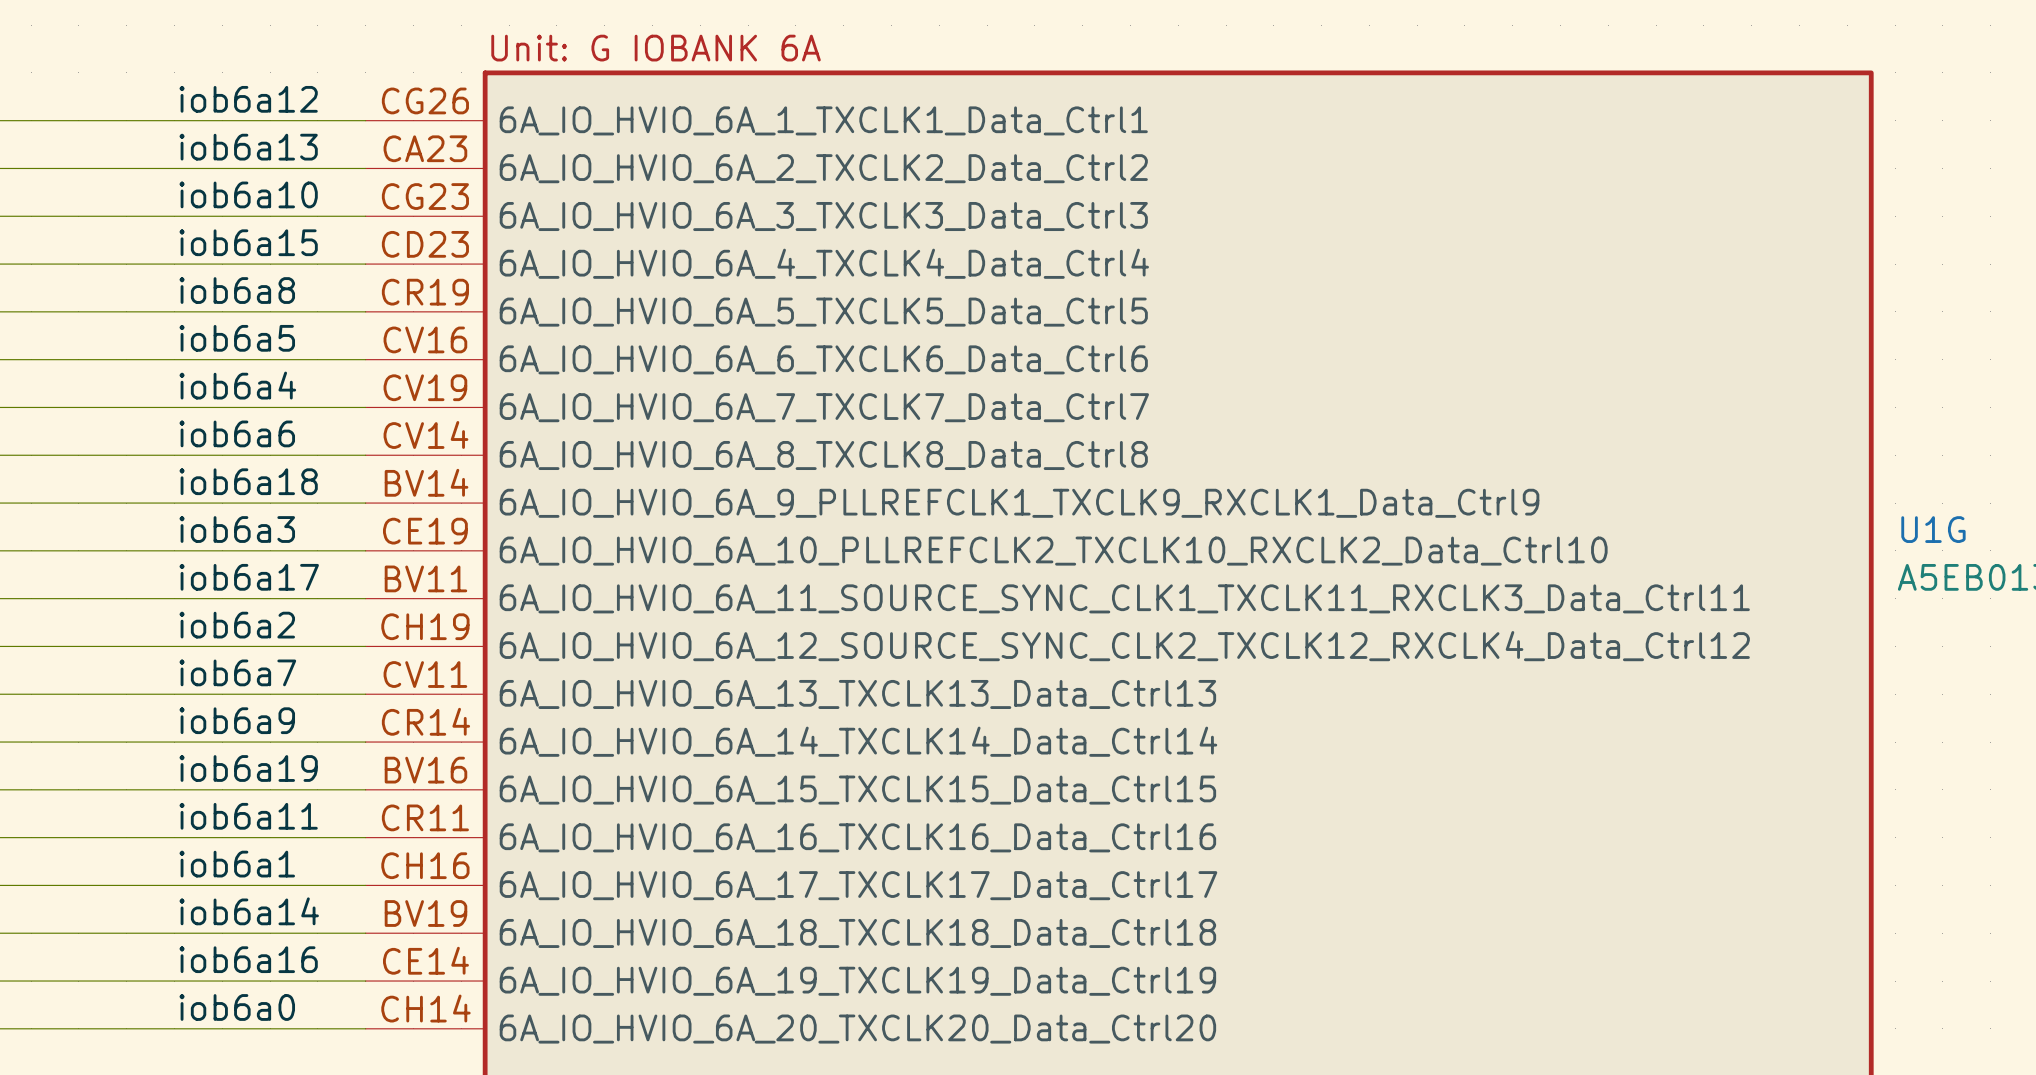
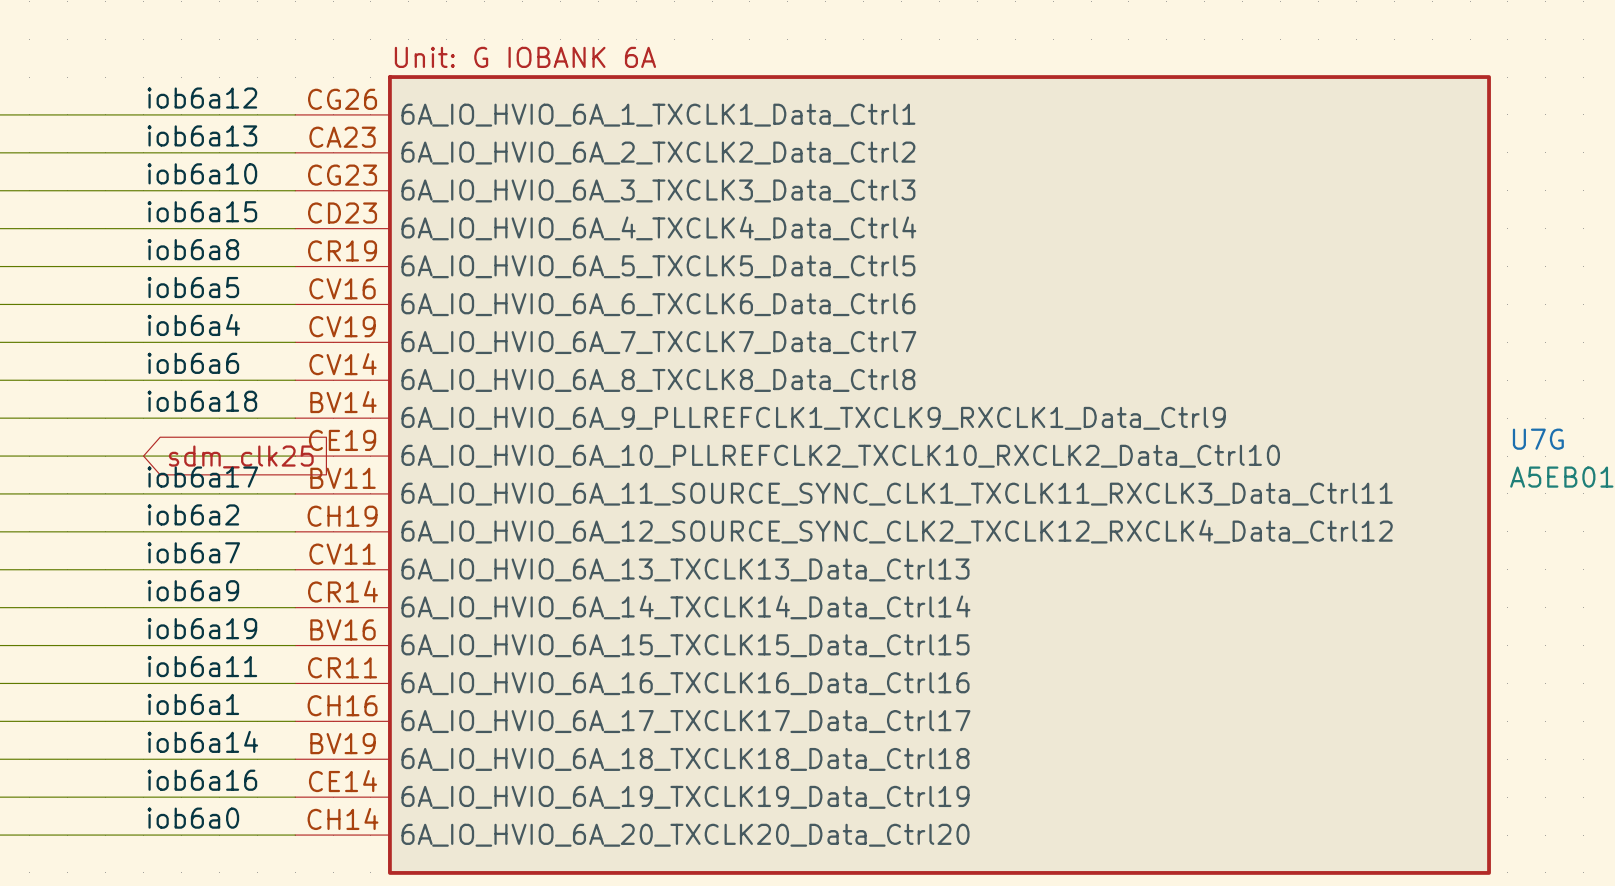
label: iob6a3 (237, 529) -> none
U1G name: U1G (1933, 529) -> U7G (1538, 439)
global label: none -> sdm_clk25 (241, 456)

